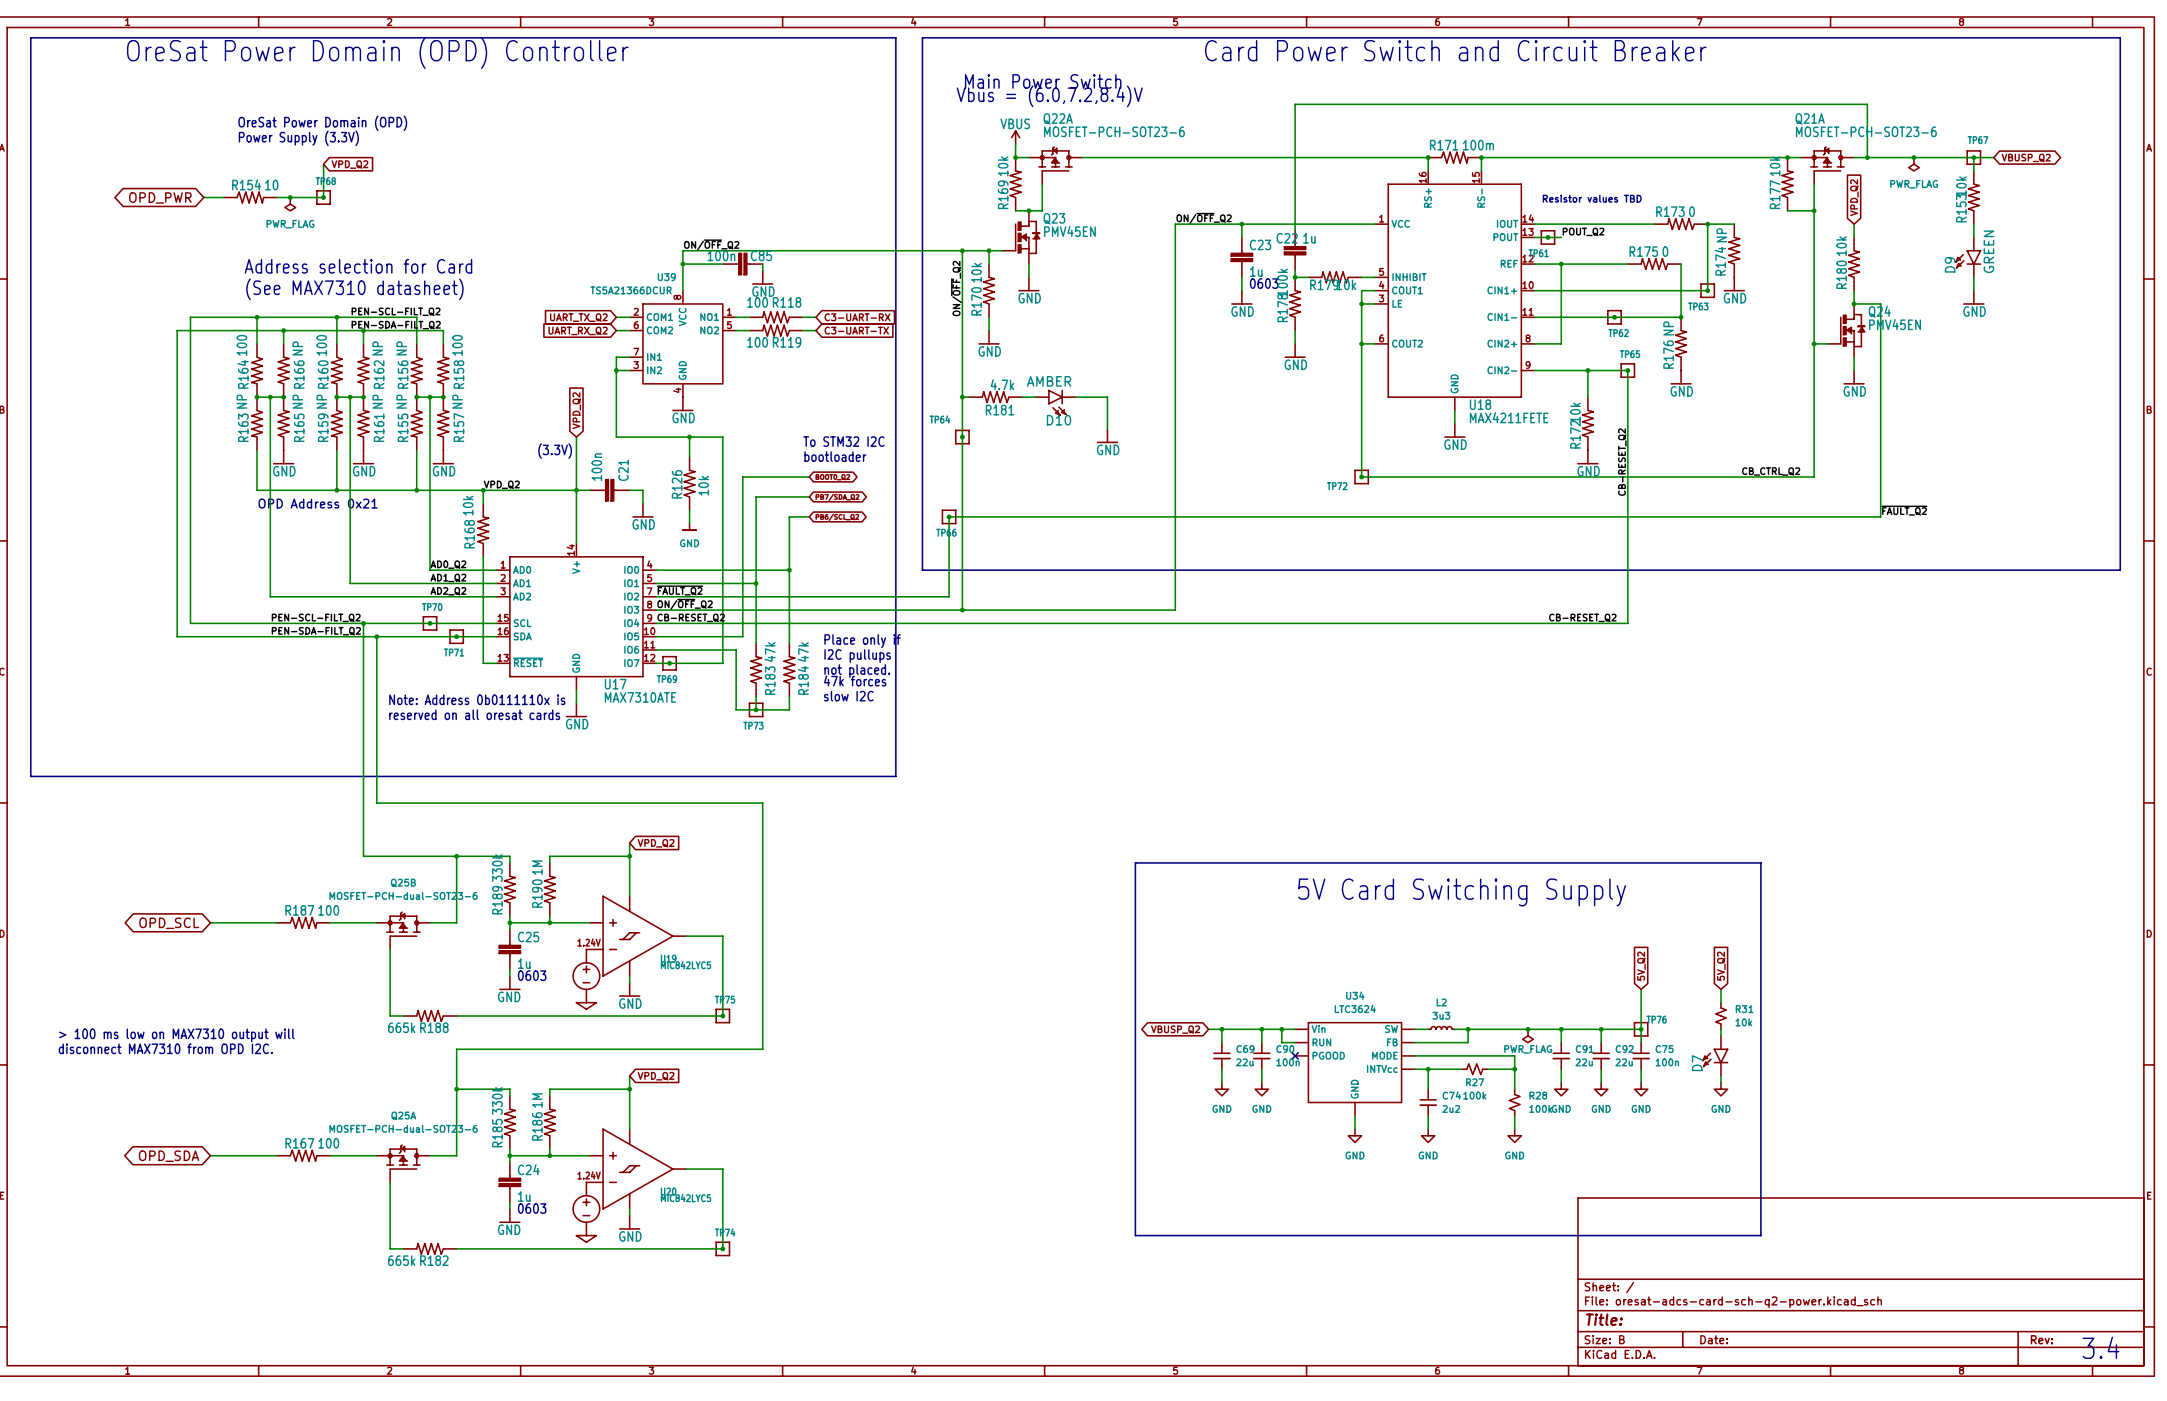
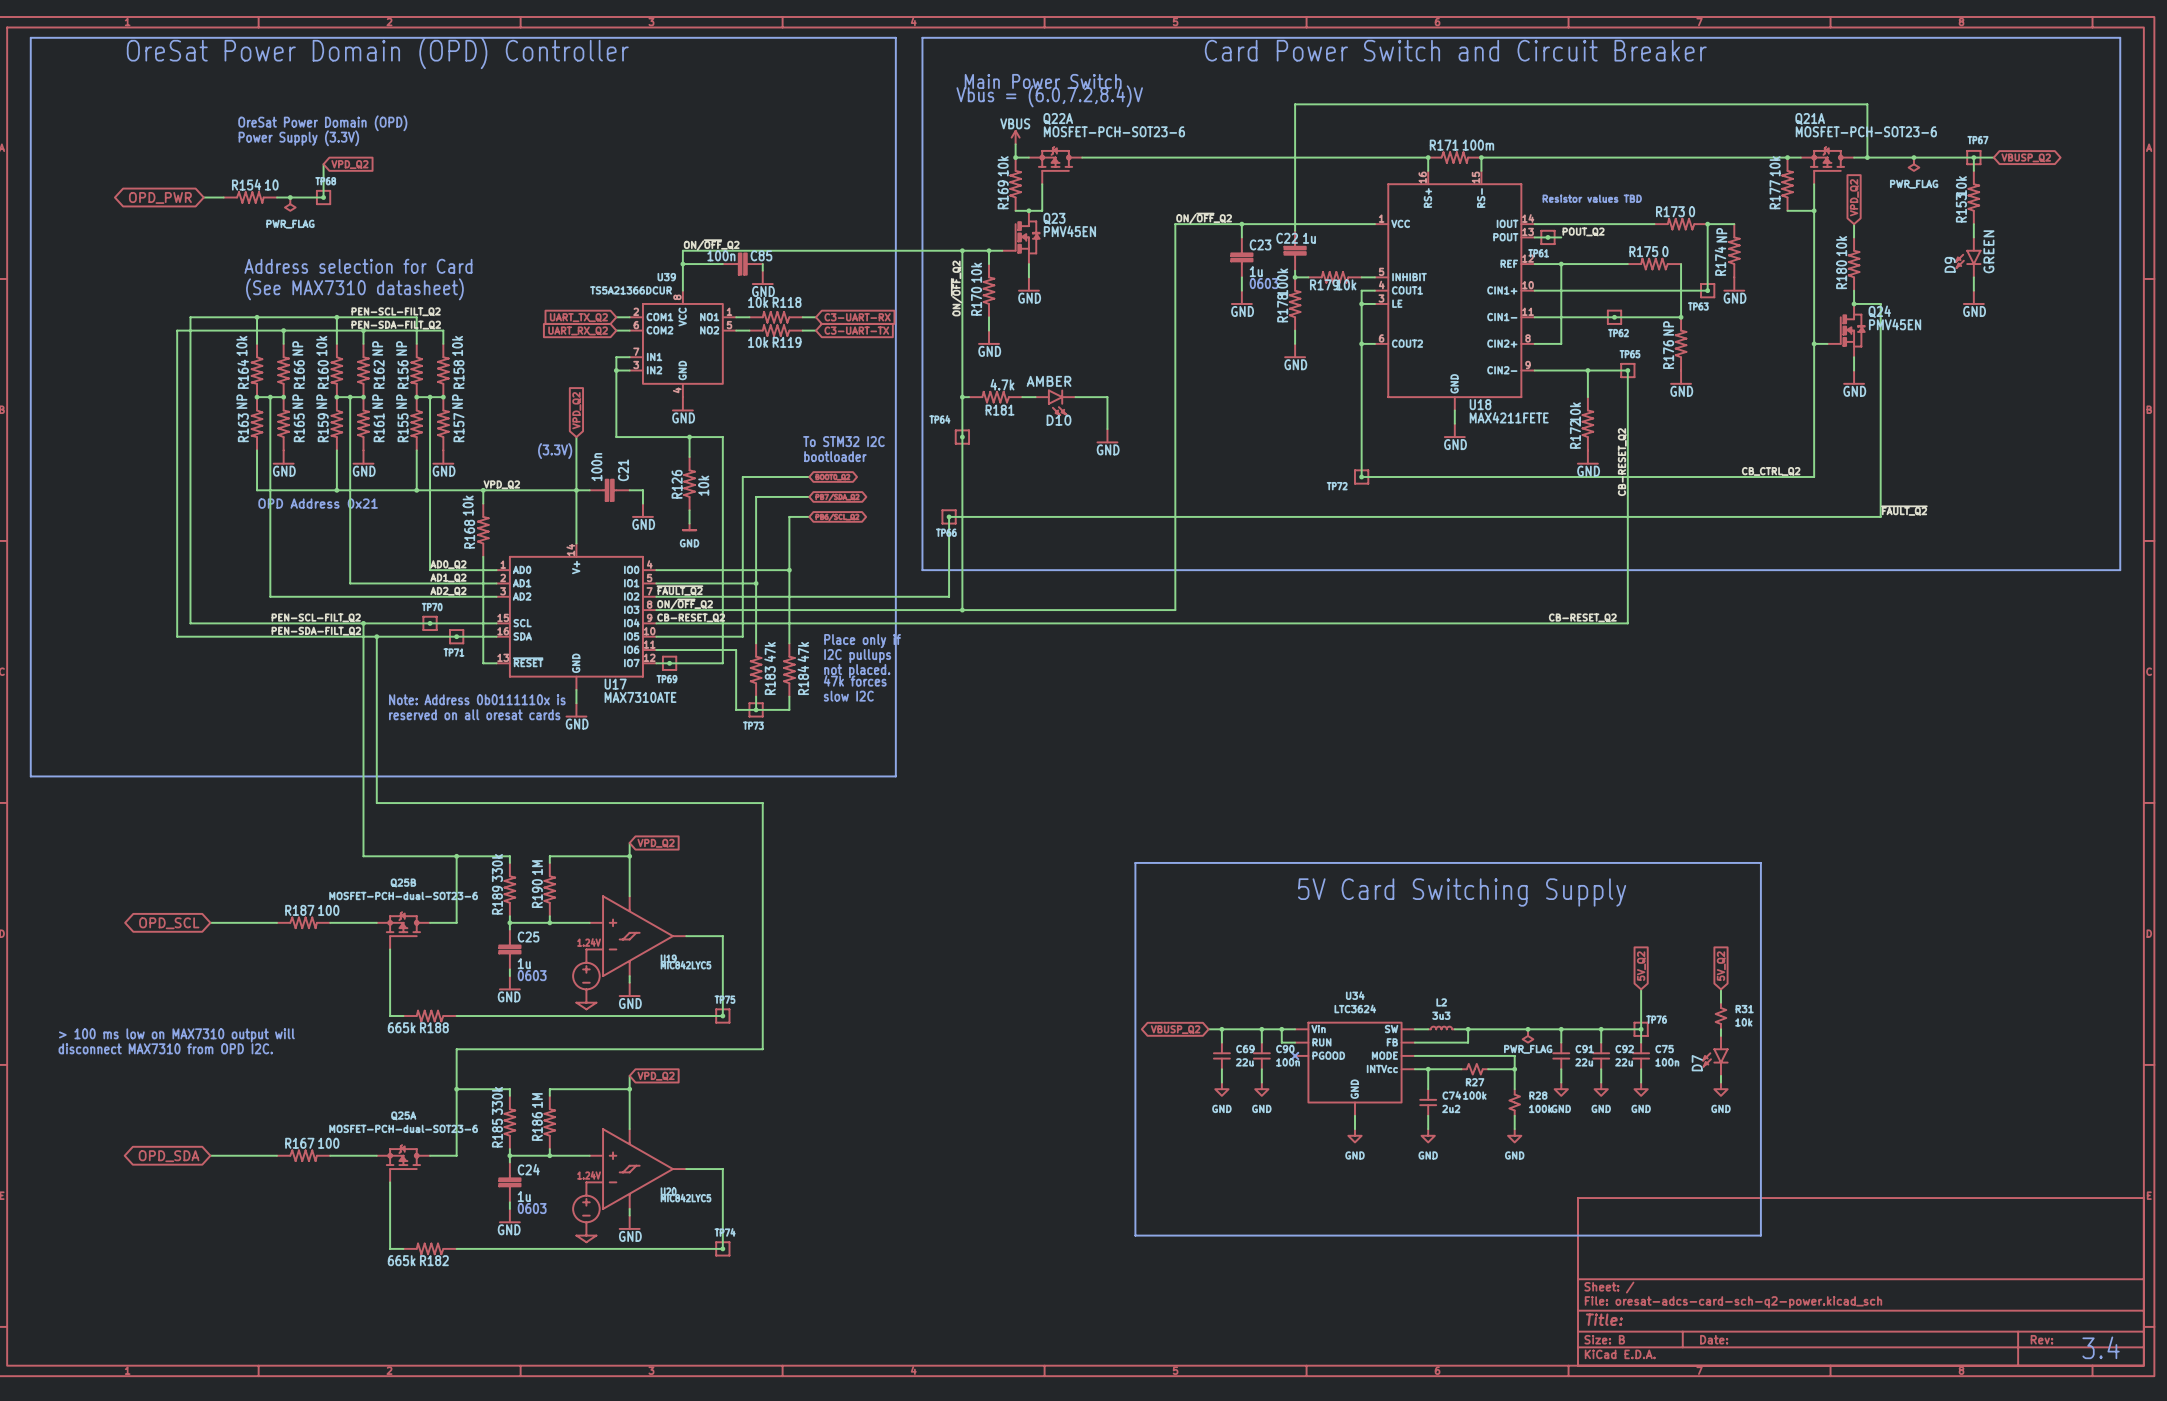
R118 value: 100 (757, 302) -> 10k (758, 302)
R119 value: 100 (757, 342) -> 10k (758, 342)
R164 value: 100 (241, 345) -> 10k (241, 345)
R160 value: 100 (321, 345) -> 10k (321, 345)
R158 value: 100 (457, 345) -> 10k (457, 345)

